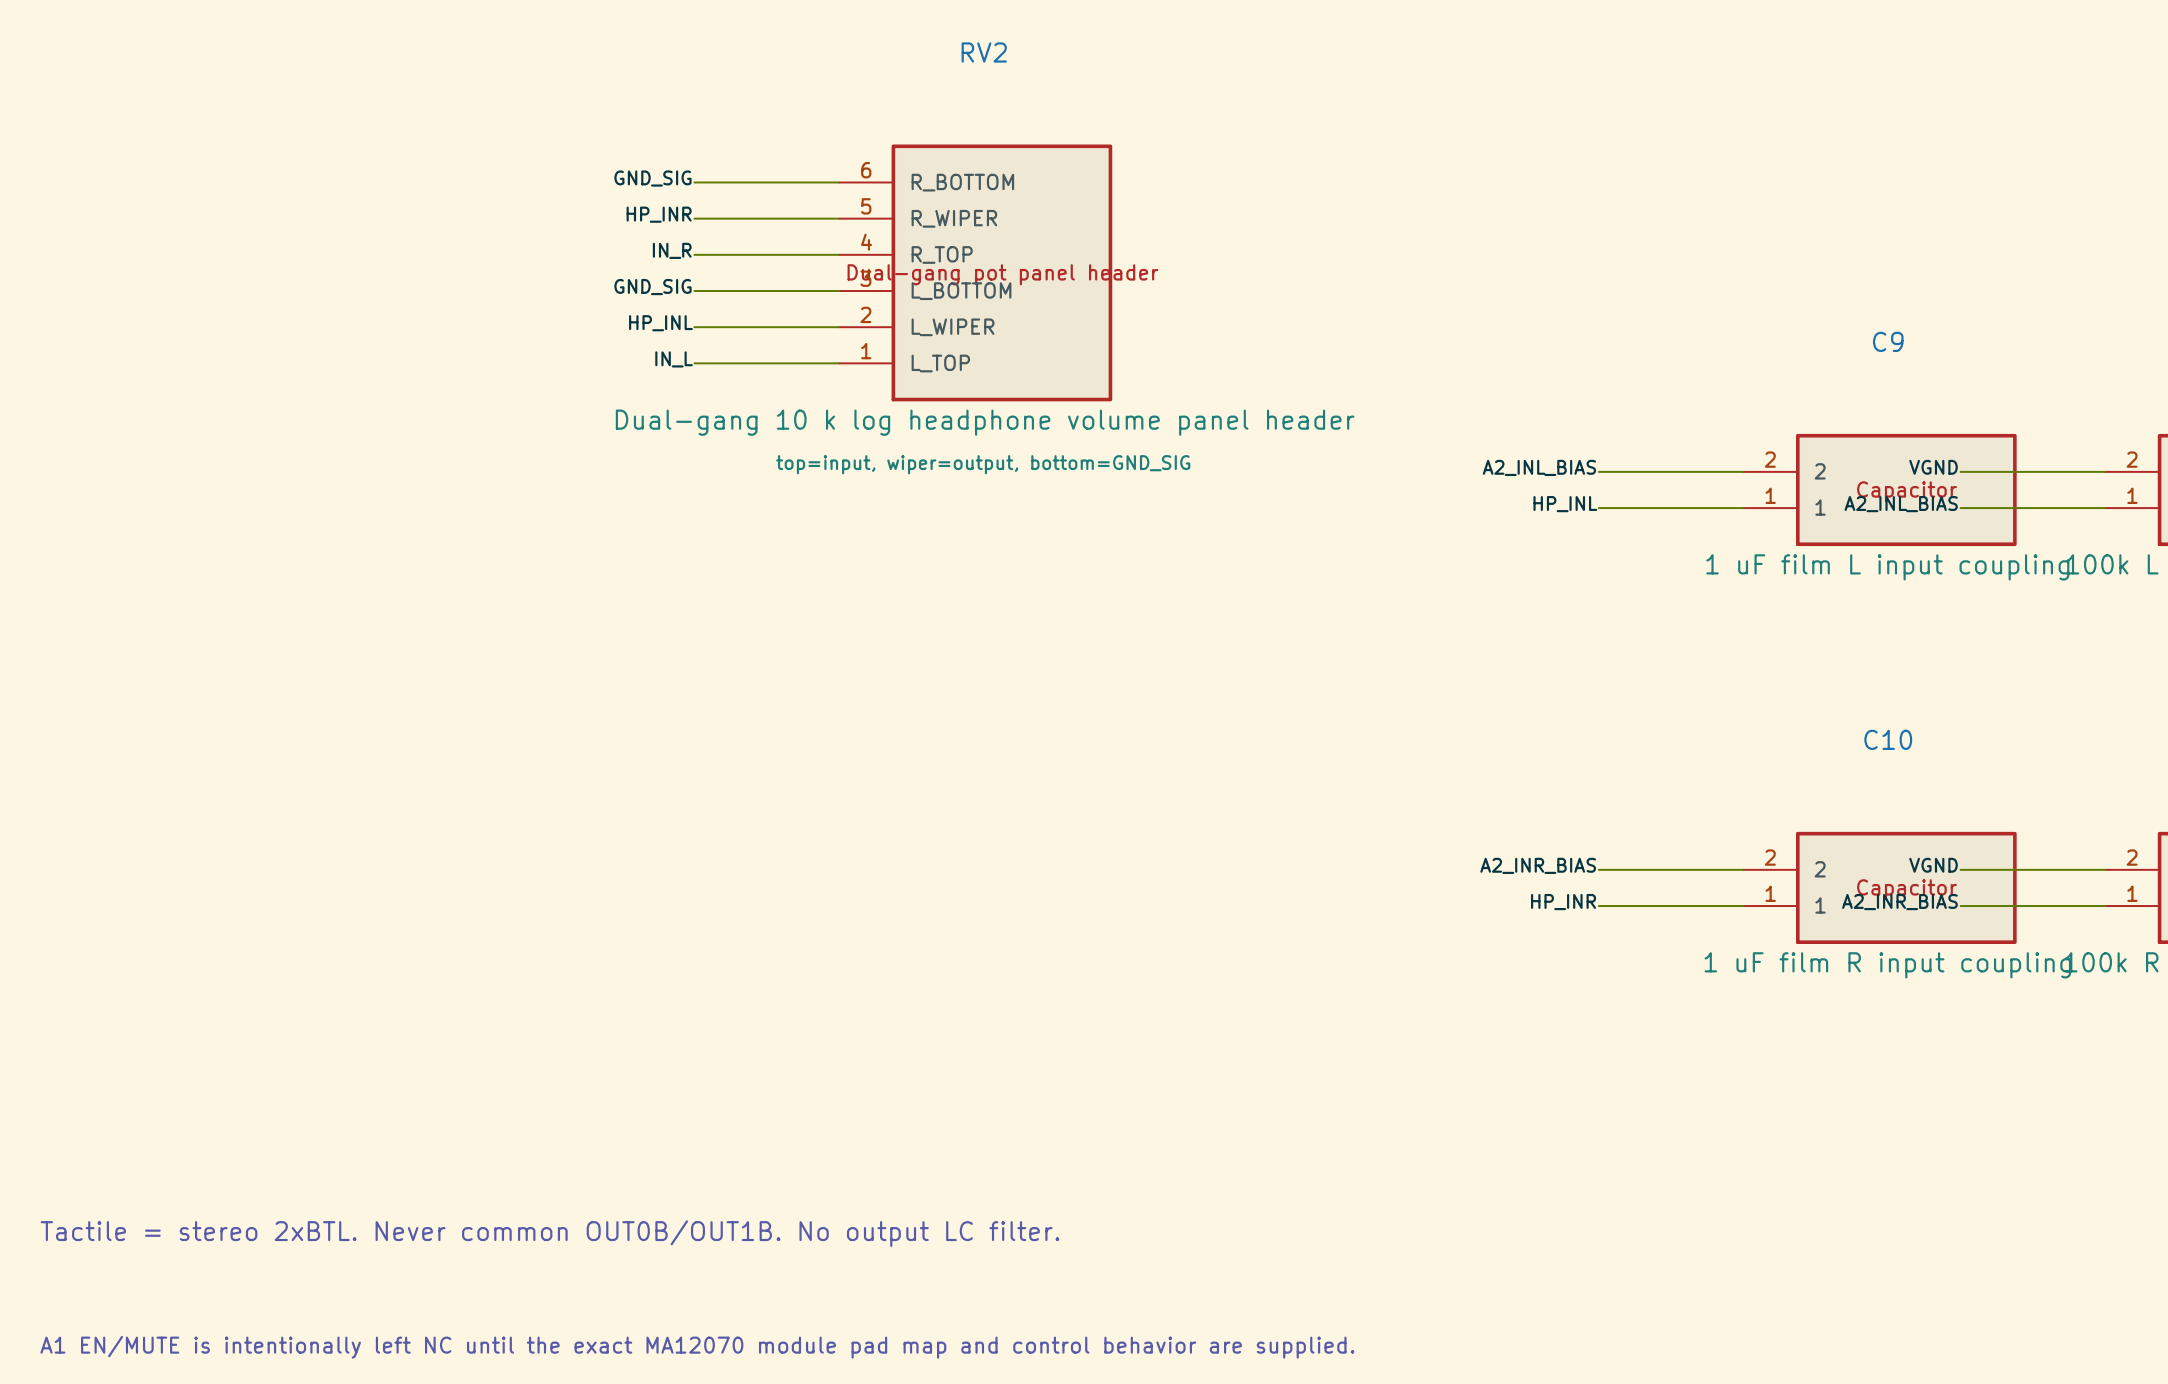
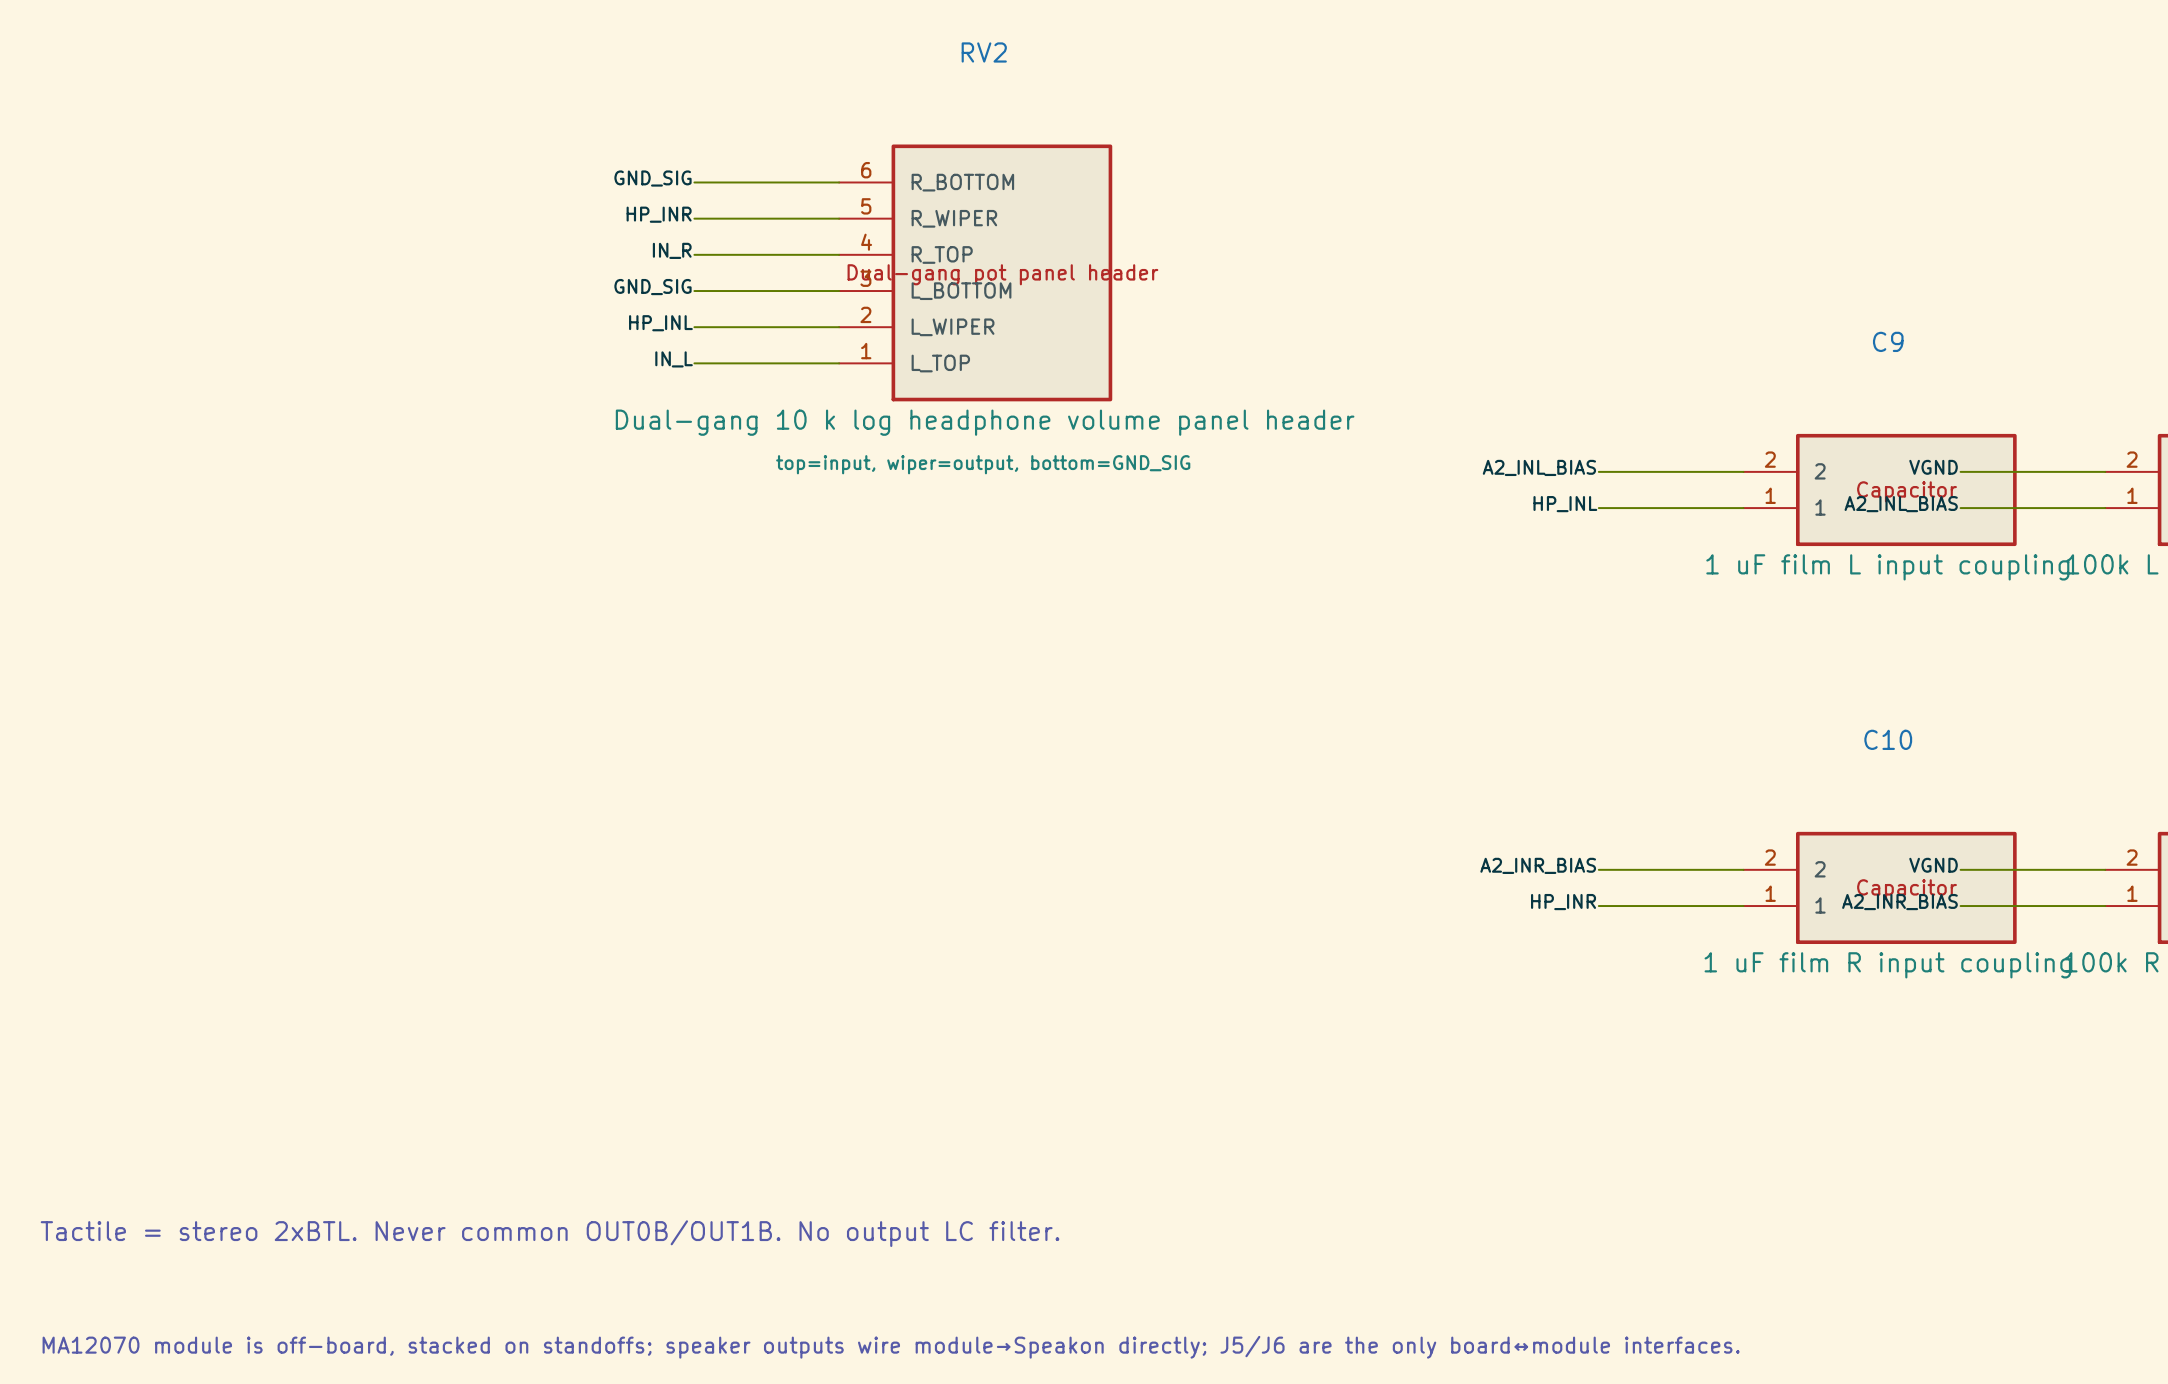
text: A1 EN/MUTE is intentionally left NC until the exact MA12070 module pad map and control behavior are supplied. (697, 1347) -> MA12070 module is off-board, stacked on standoffs; speaker outputs wire module→Speakon directly; J5/J6 are the only board↔module interfaces. (891, 1347)

